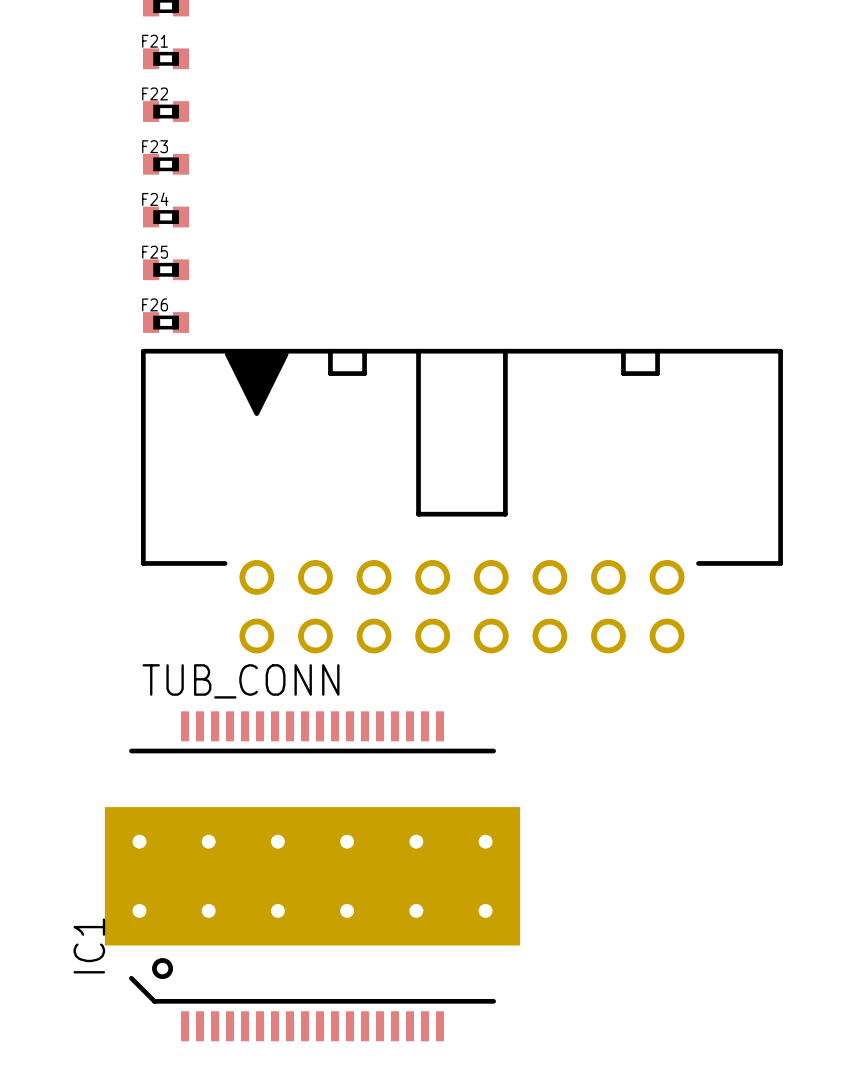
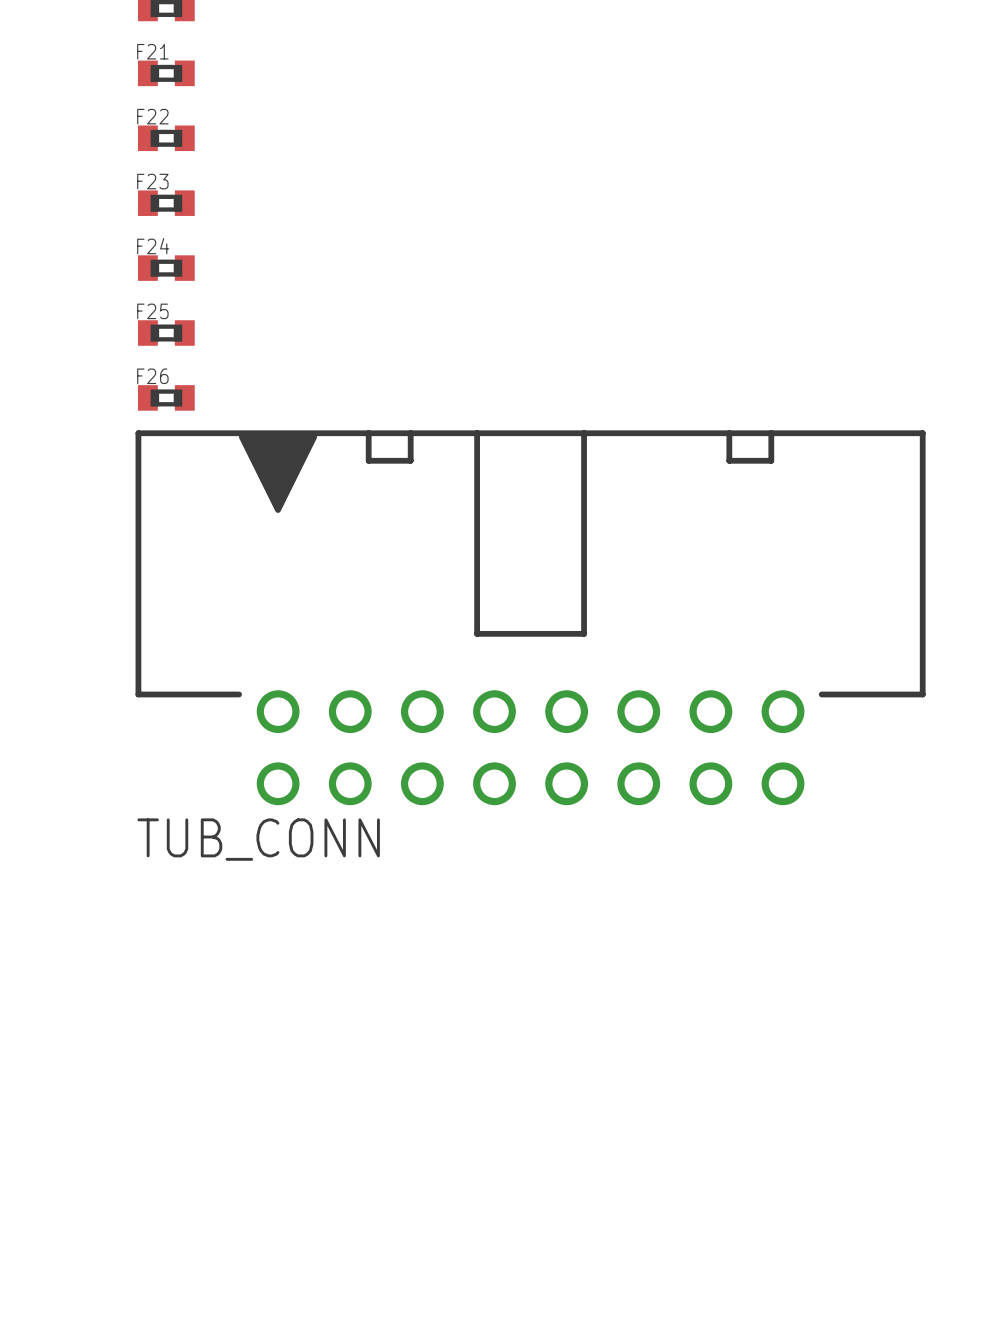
IC1: (312, 876) -> none

